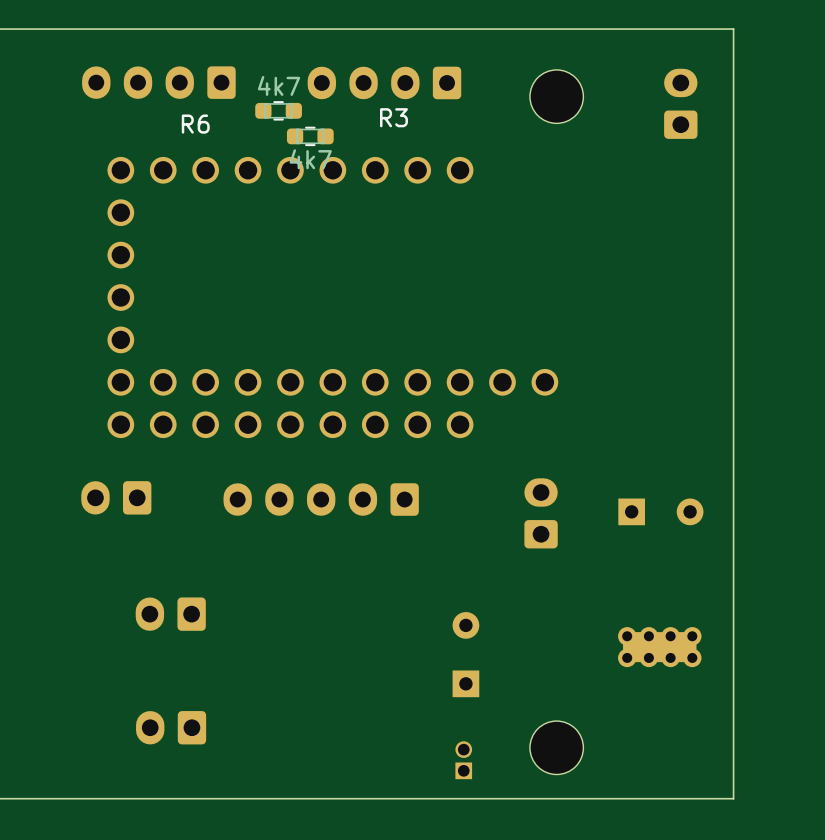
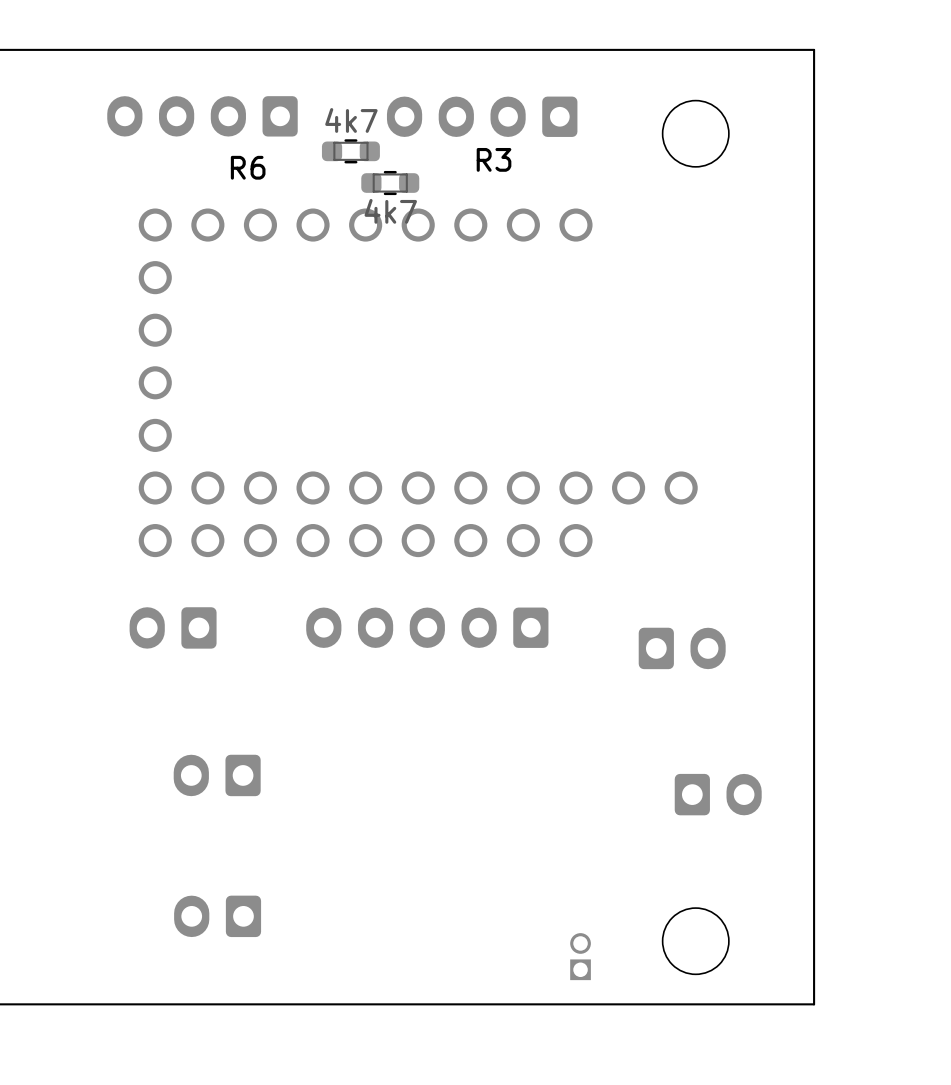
board edge: (652, 29) (733, 29) (733, 798) (652, 798) -> (814, 49) (814, 1004)
part: (680, 103) -> none
part position: (116, 497) -> (173, 627)
part position: (321, 499) -> (427, 627)
part: (660, 511) -> none
part rotation: 0° (541, 513) -> 90° clockwise (682, 648)
part: none -> (718, 794)
part: (659, 647) -> none
part: (465, 654) -> none

